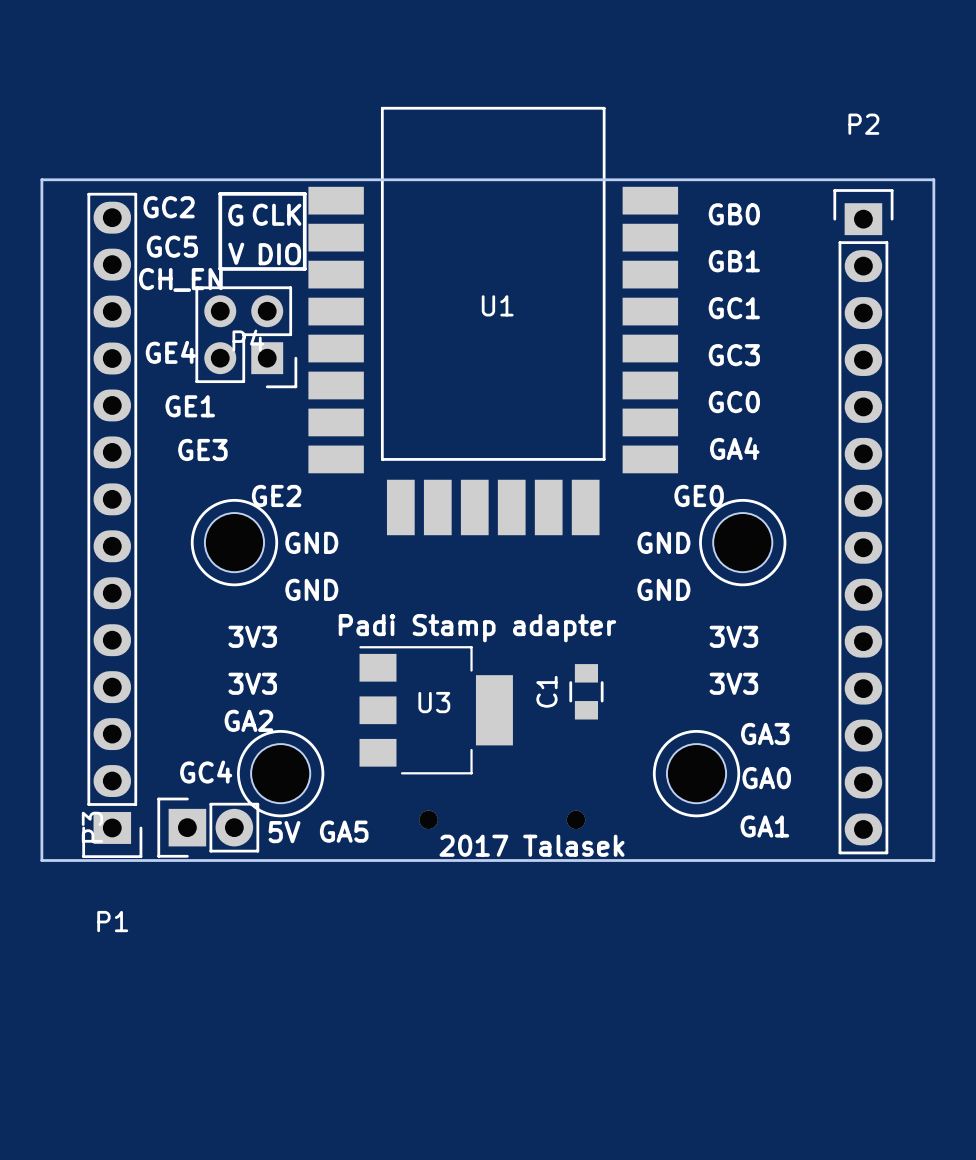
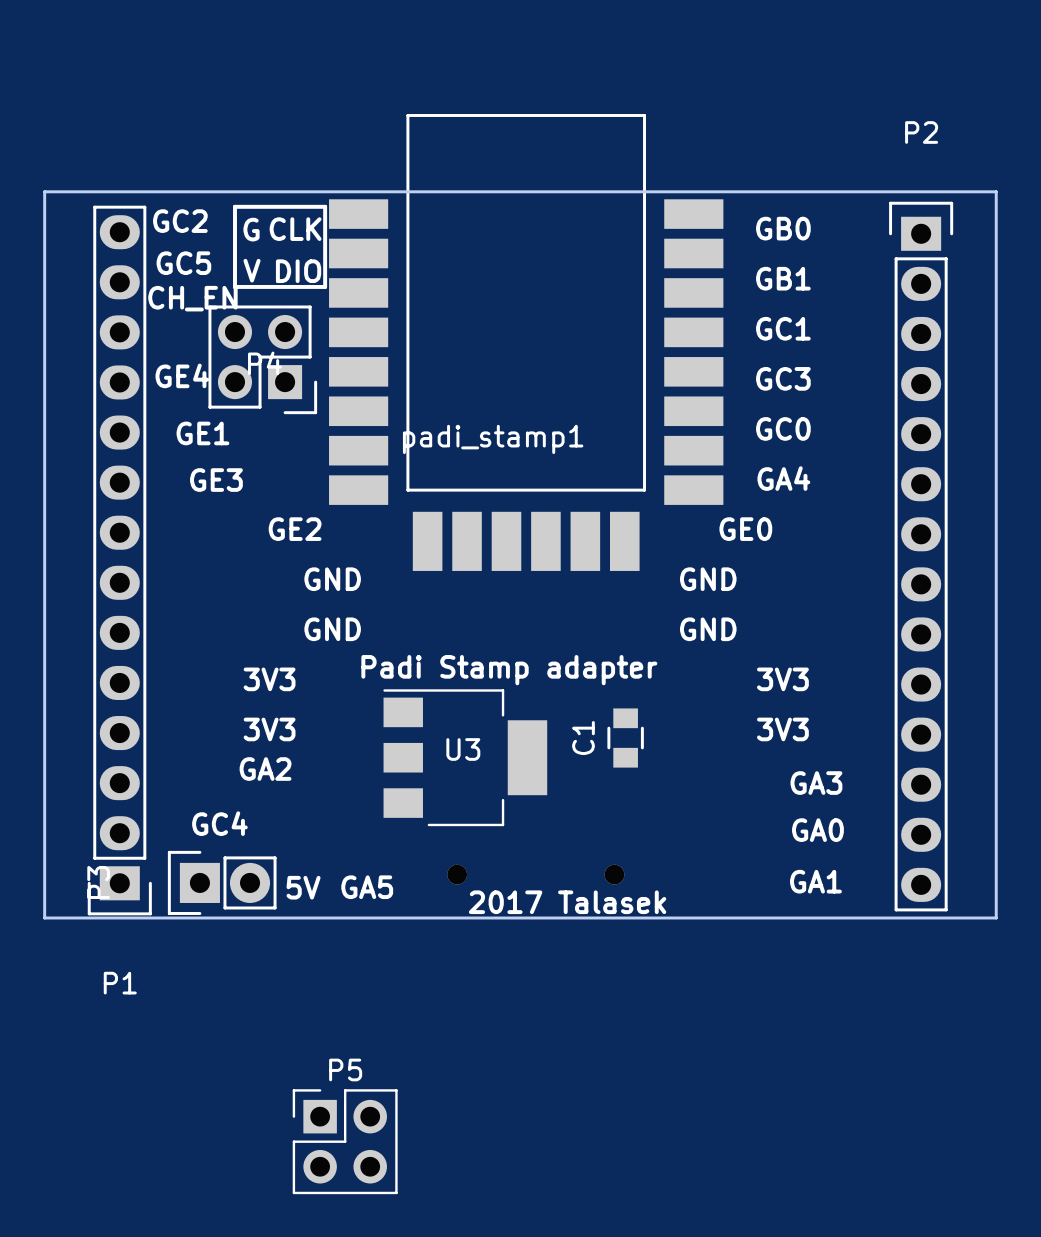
U1 name: U1 (497, 305) -> padi_stamp1 (493, 439)
part: (234, 542) -> none
part: (742, 542) -> none
part: (280, 773) -> none
part: (696, 773) -> none
P5: none -> (345, 1141)

